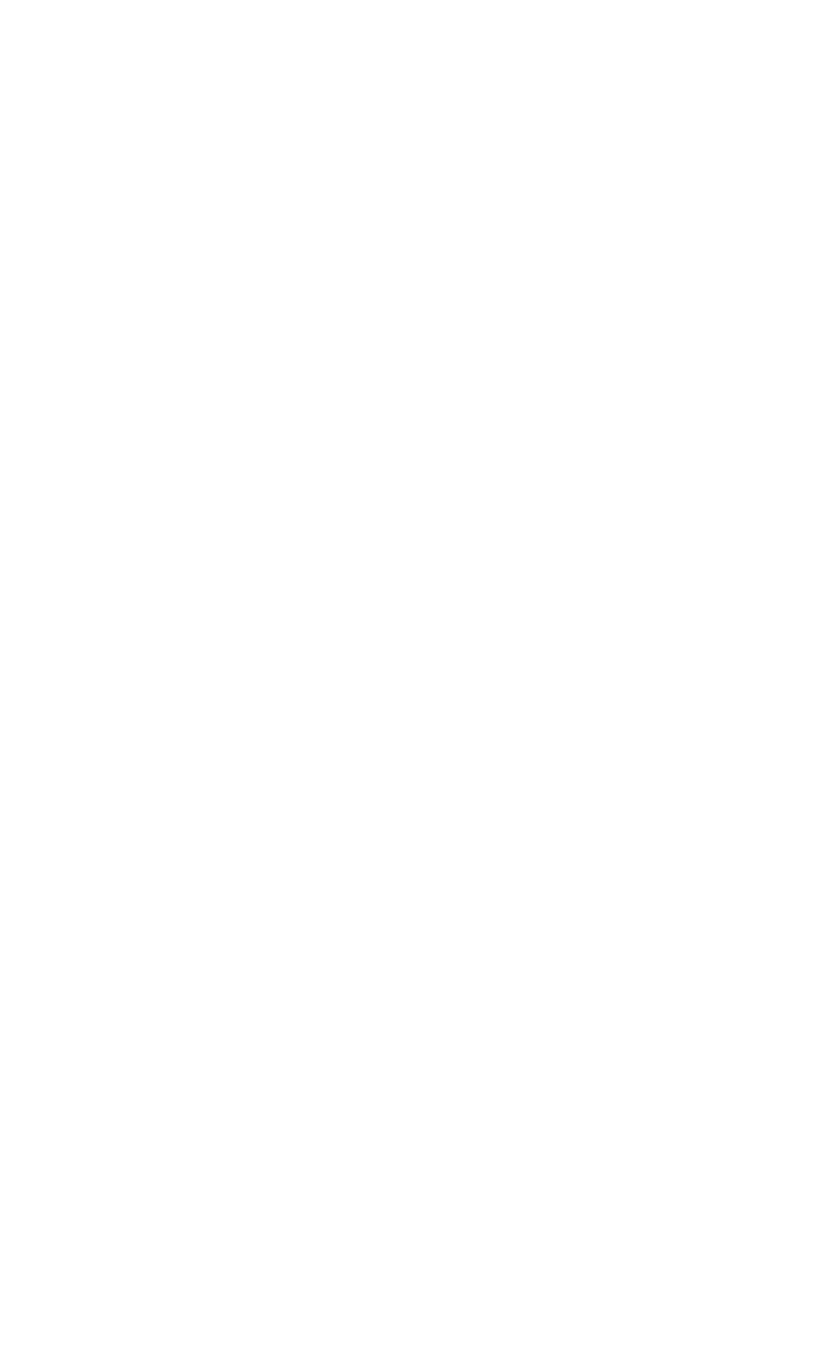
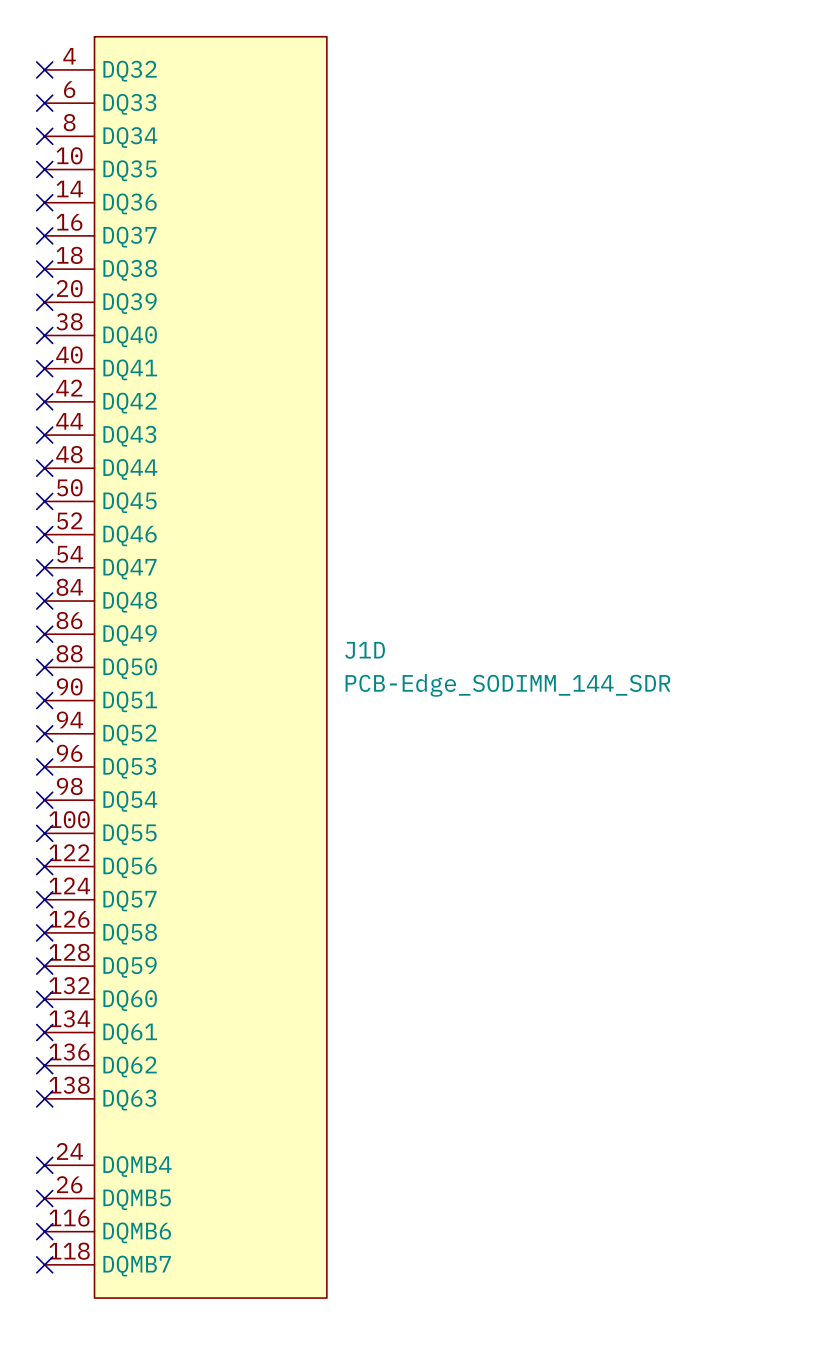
no-connect mark: none -> (44, 69)
no-connect mark: none -> (44, 103)
no-connect mark: none -> (44, 136)
no-connect mark: none -> (44, 169)
no-connect mark: none -> (44, 202)
no-connect mark: none -> (44, 235)
no-connect mark: none -> (44, 269)
no-connect mark: none -> (44, 302)
no-connect mark: none -> (44, 335)
no-connect mark: none -> (44, 368)
no-connect mark: none -> (44, 401)
no-connect mark: none -> (44, 435)
no-connect mark: none -> (44, 468)
no-connect mark: none -> (44, 501)
no-connect mark: none -> (44, 534)
no-connect mark: none -> (44, 567)
no-connect mark: none -> (44, 601)
no-connect mark: none -> (44, 634)
no-connect mark: none -> (44, 667)
J1D: none -> PCB-Edge_SODIMM_144_SDR (185, 667)
no-connect mark: none -> (44, 700)
no-connect mark: none -> (44, 733)
no-connect mark: none -> (44, 766)
no-connect mark: none -> (44, 800)
no-connect mark: none -> (44, 833)
no-connect mark: none -> (44, 866)
no-connect mark: none -> (44, 899)
no-connect mark: none -> (44, 932)
no-connect mark: none -> (44, 966)
no-connect mark: none -> (44, 999)
no-connect mark: none -> (44, 1032)
no-connect mark: none -> (44, 1065)
no-connect mark: none -> (44, 1098)
no-connect mark: none -> (44, 1165)
no-connect mark: none -> (44, 1198)
no-connect mark: none -> (44, 1231)
no-connect mark: none -> (44, 1264)

